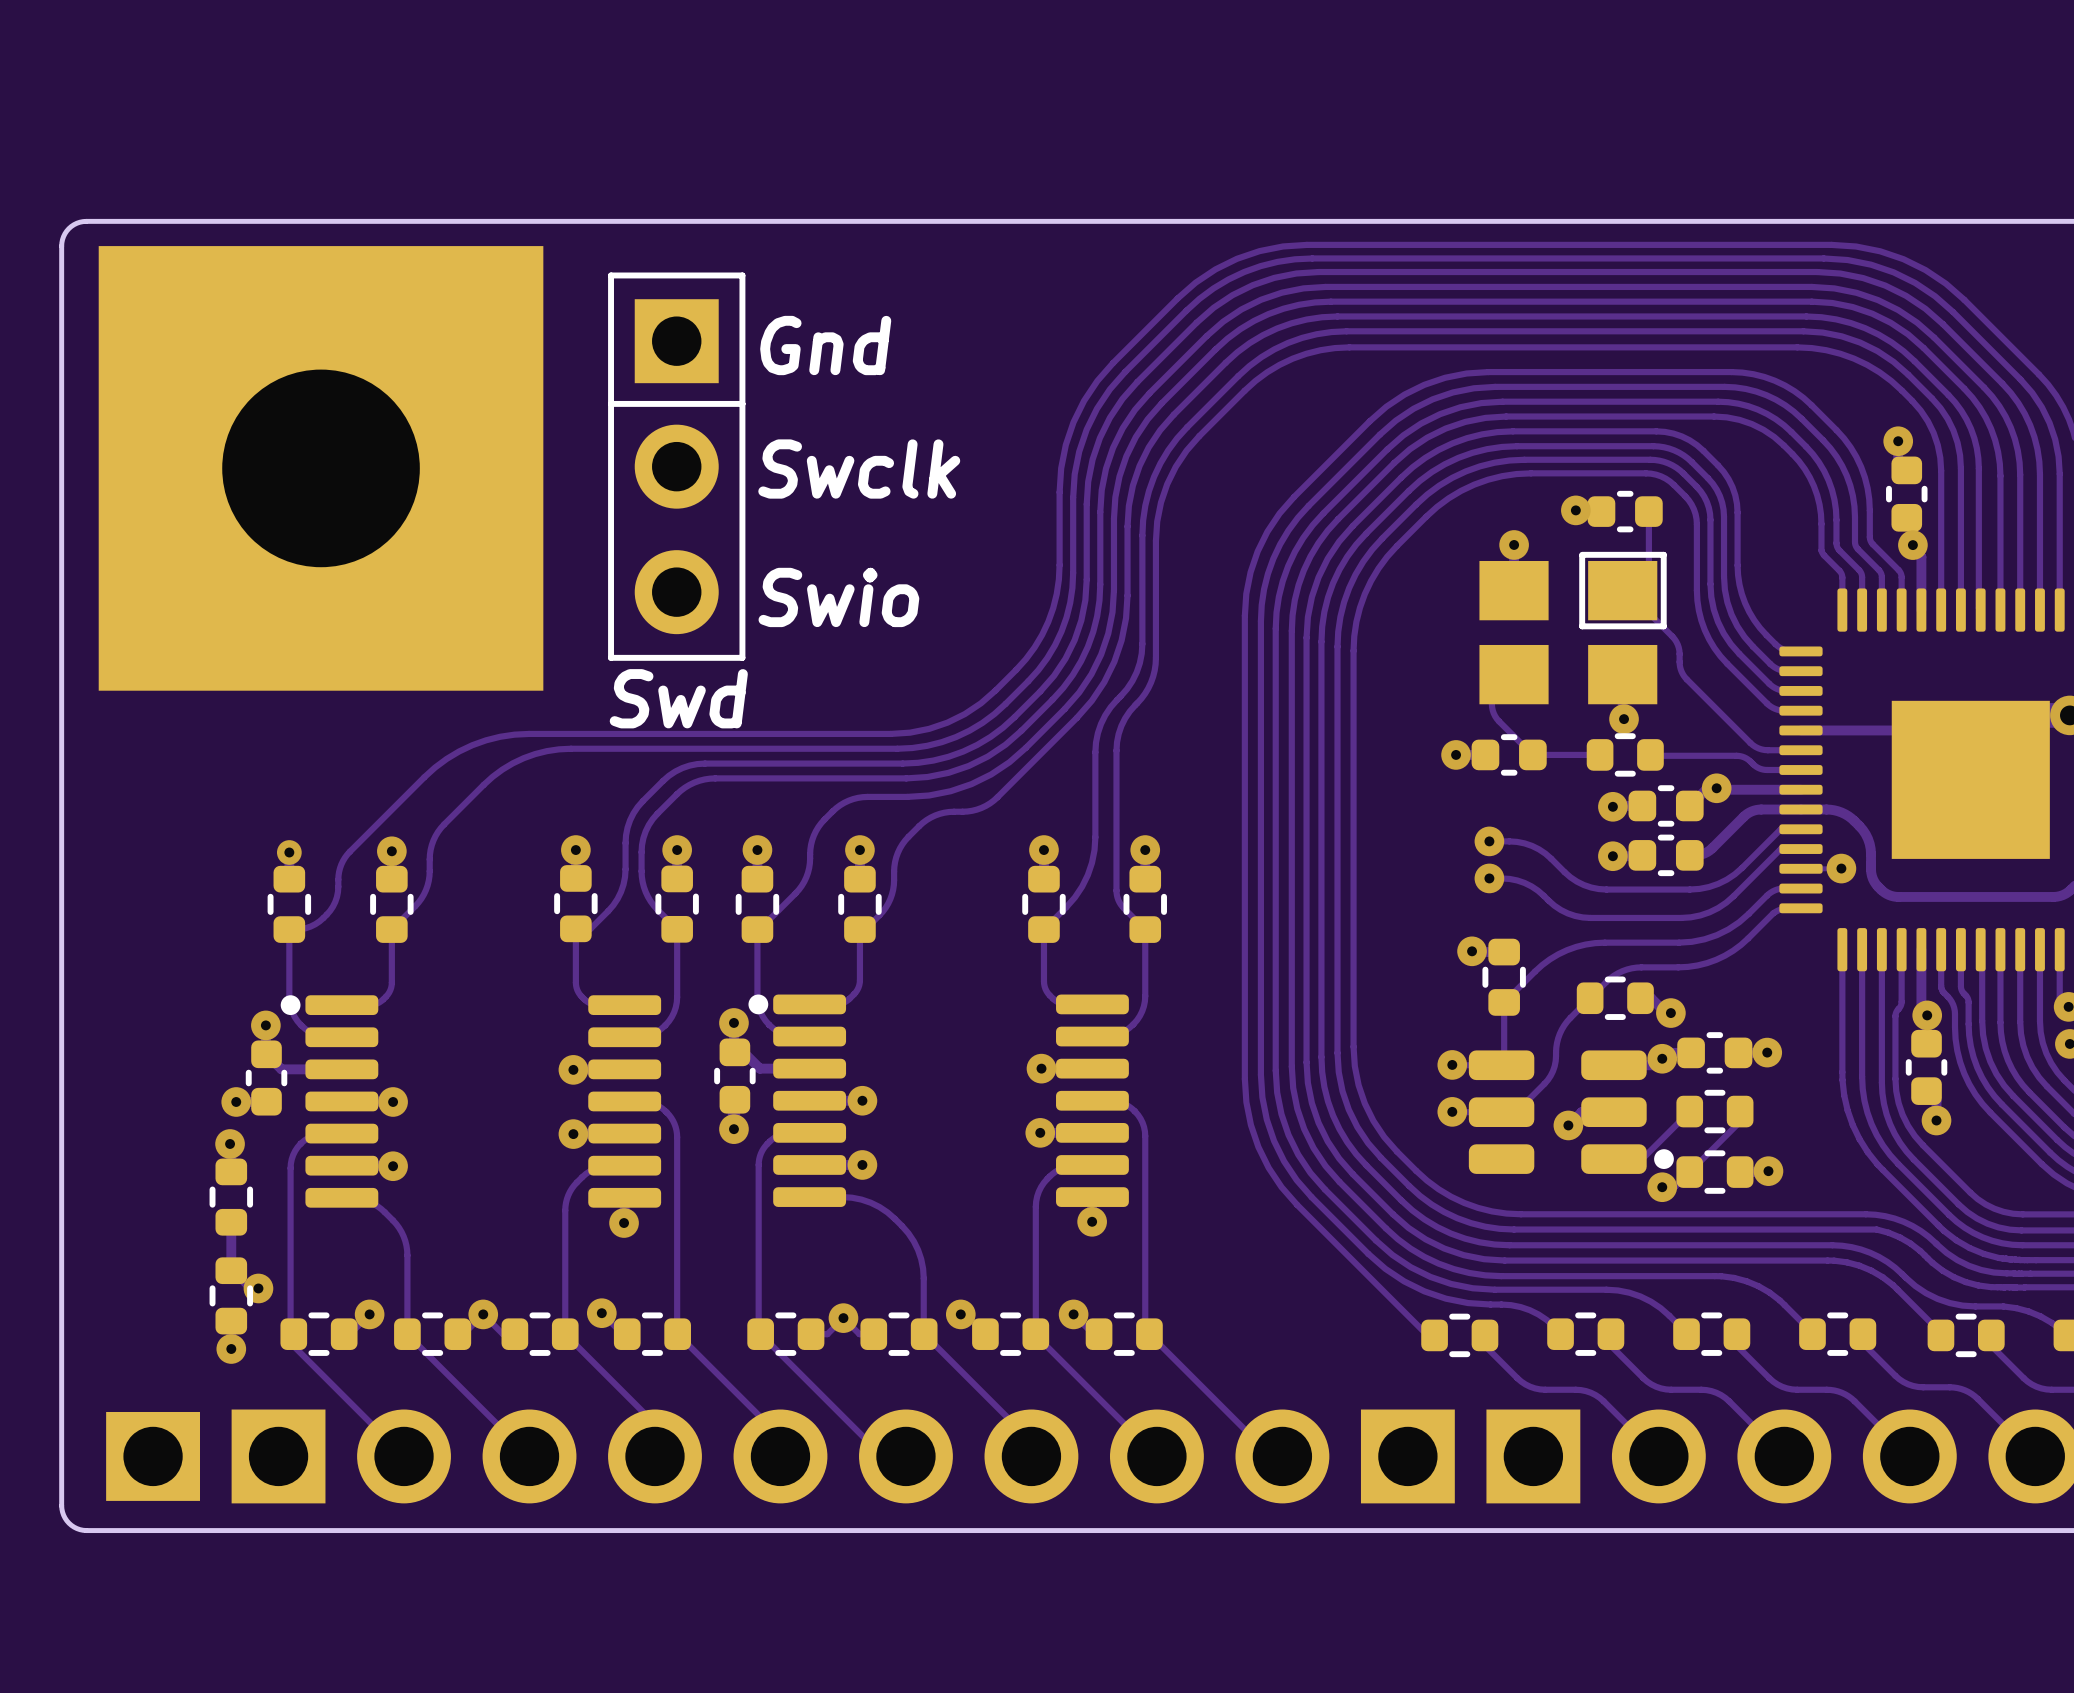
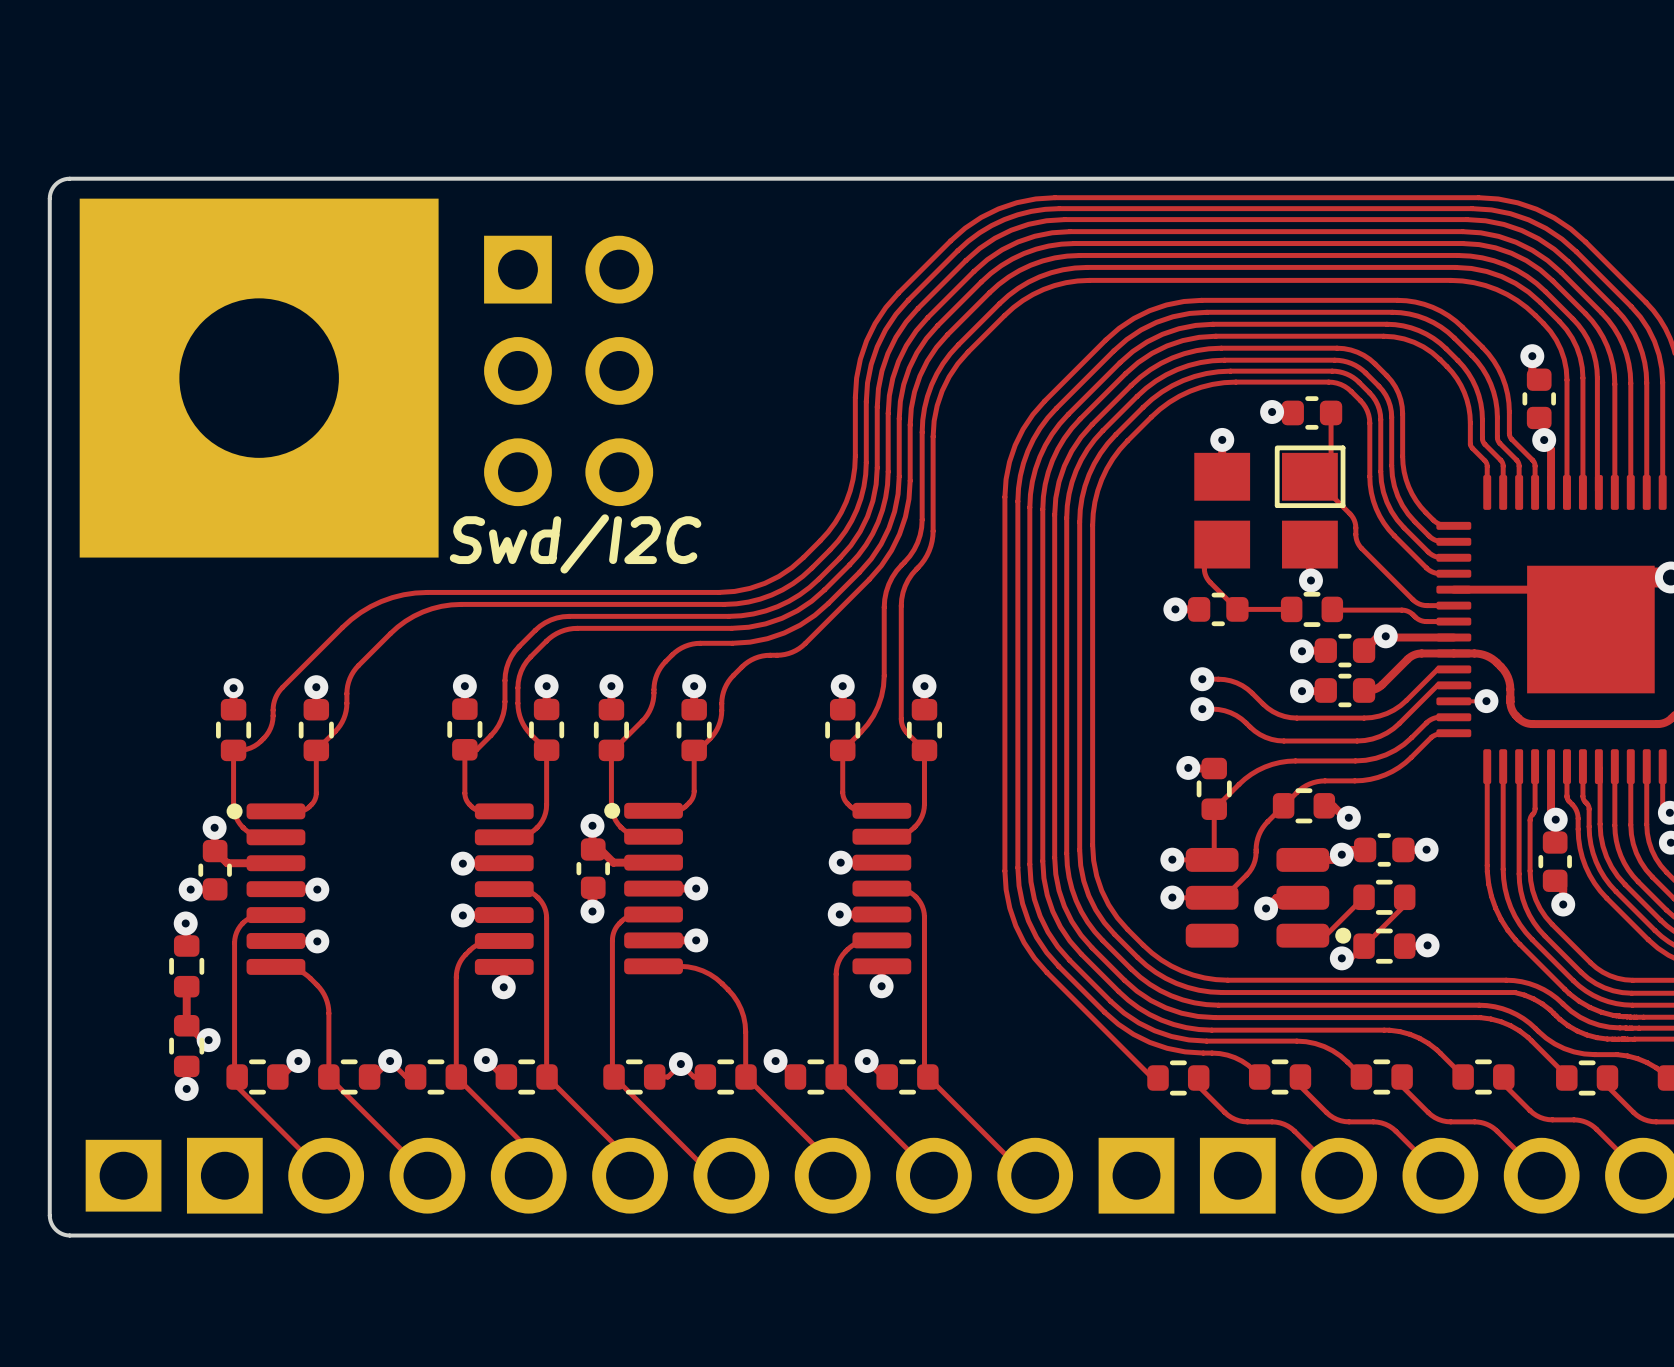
part footprint: [608, 272, 746, 661] -> [484, 235, 654, 507]
text: Gnd (825, 345) -> none
text: Swclk (859, 469) -> none
text: Swio (838, 597) -> none
text: Swd (678, 698) -> Swd/I2C (575, 543)

